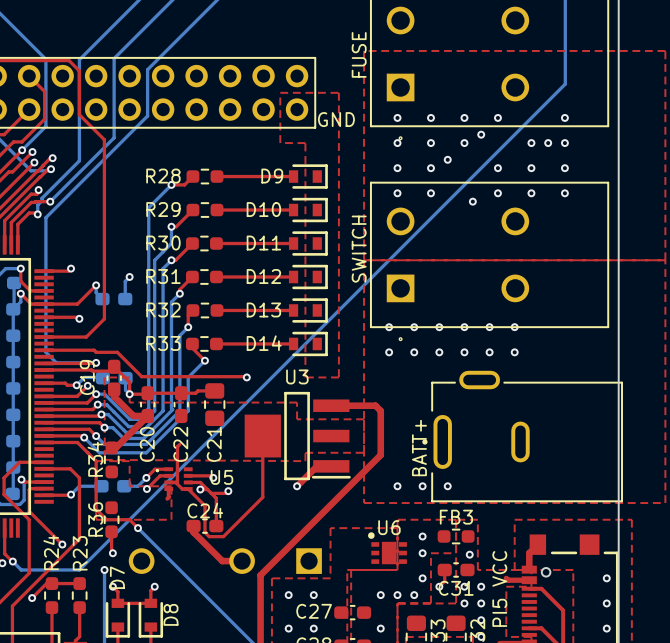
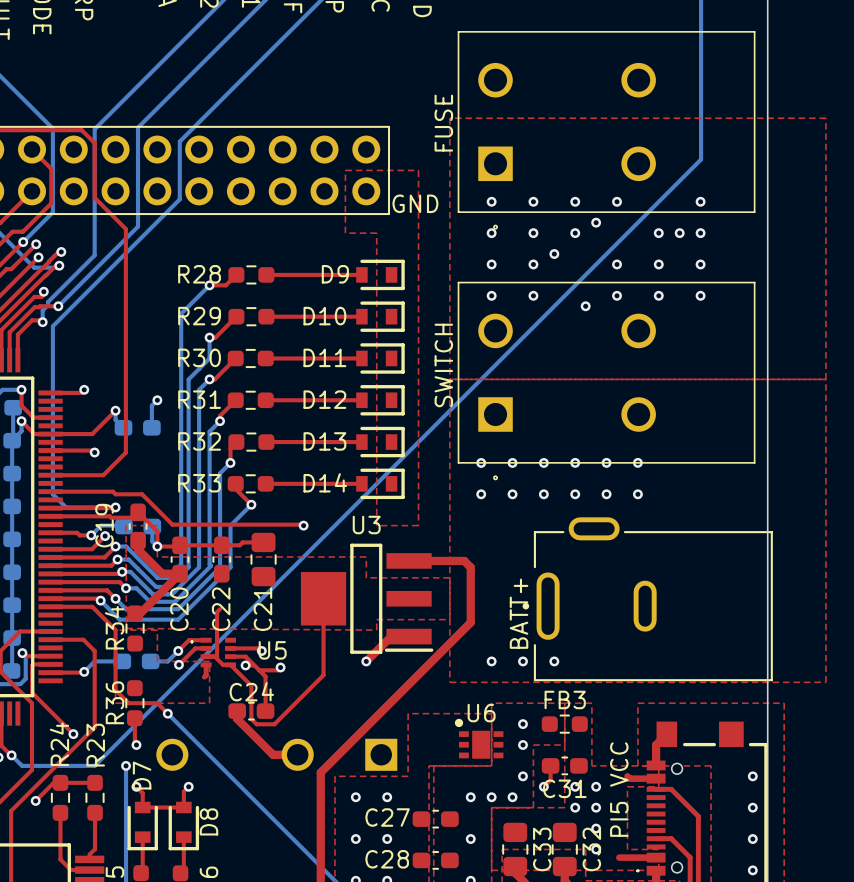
via: (469, 554) -> none

